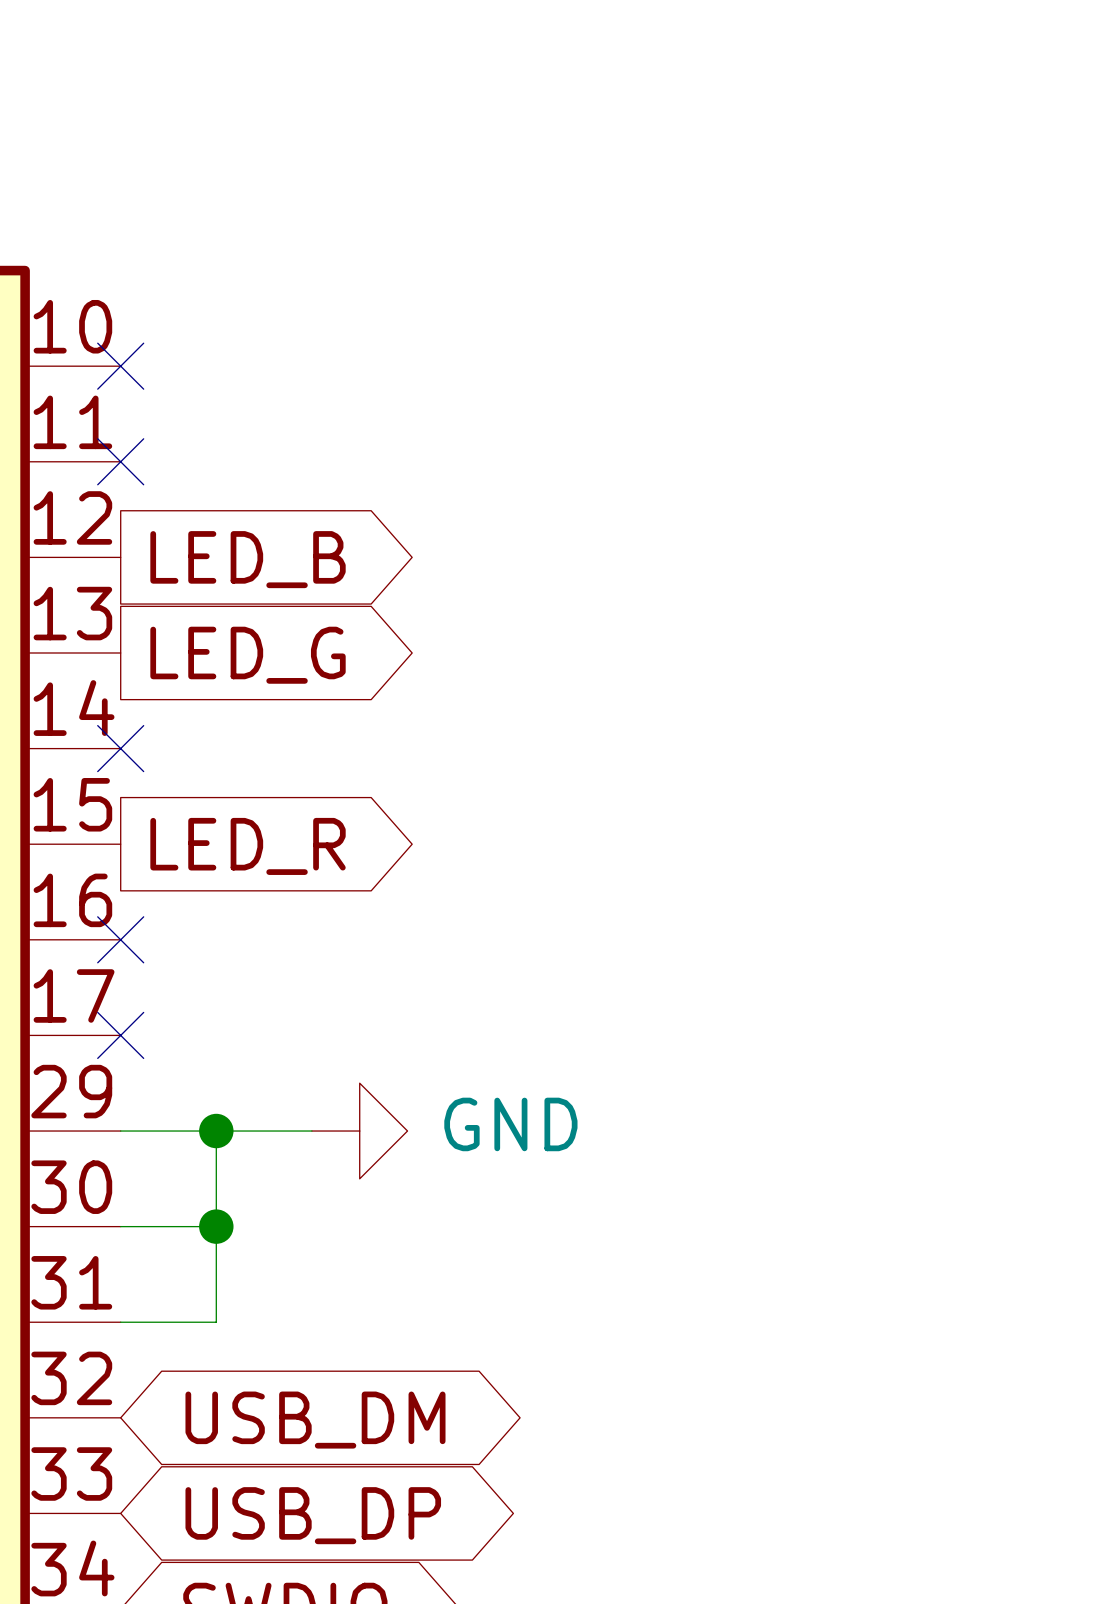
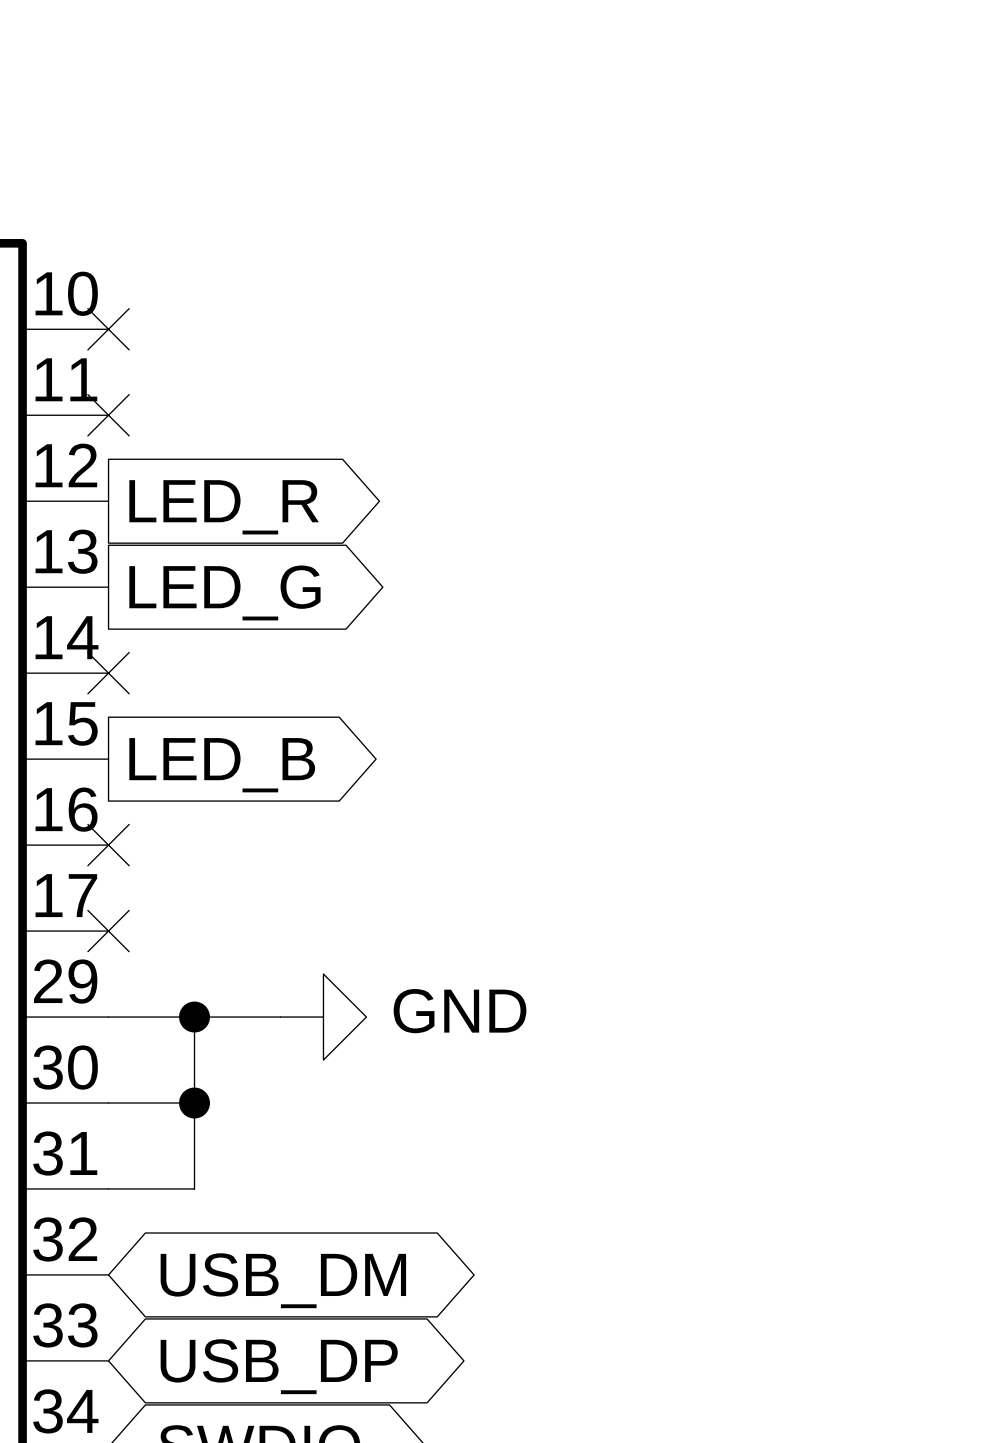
global label: LED_B (248, 559) -> LED_R (224, 507)
global label: LED_R (248, 846) -> LED_B (222, 765)

